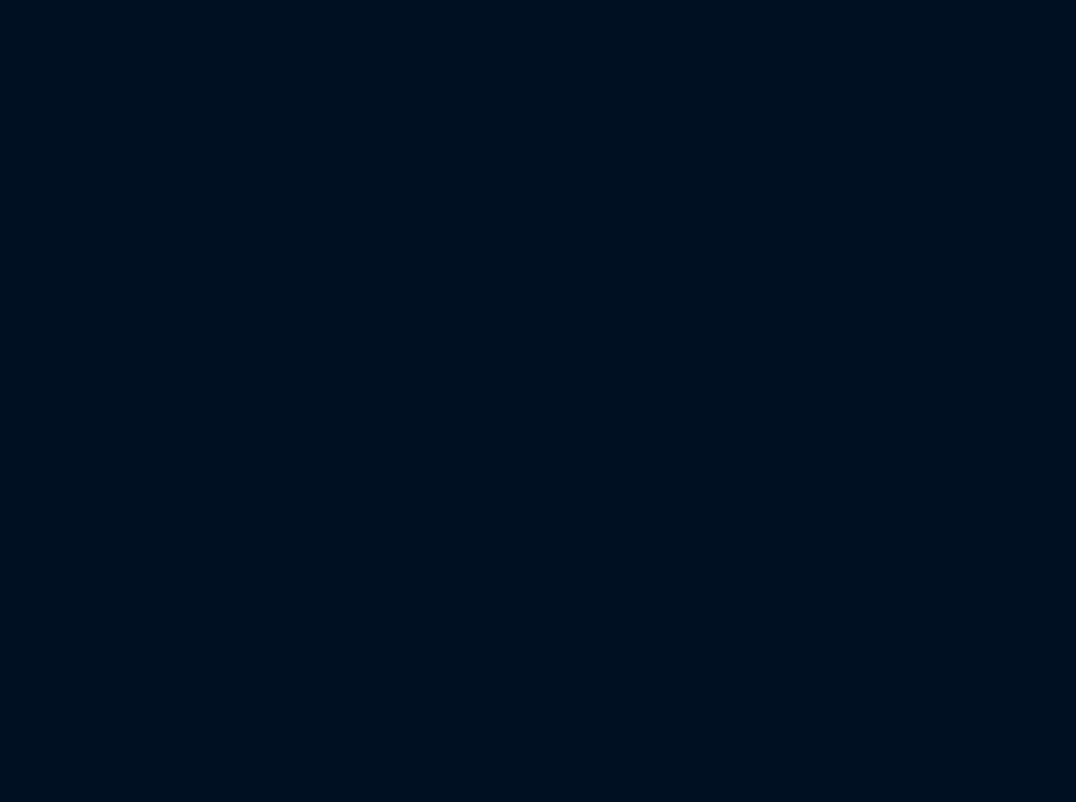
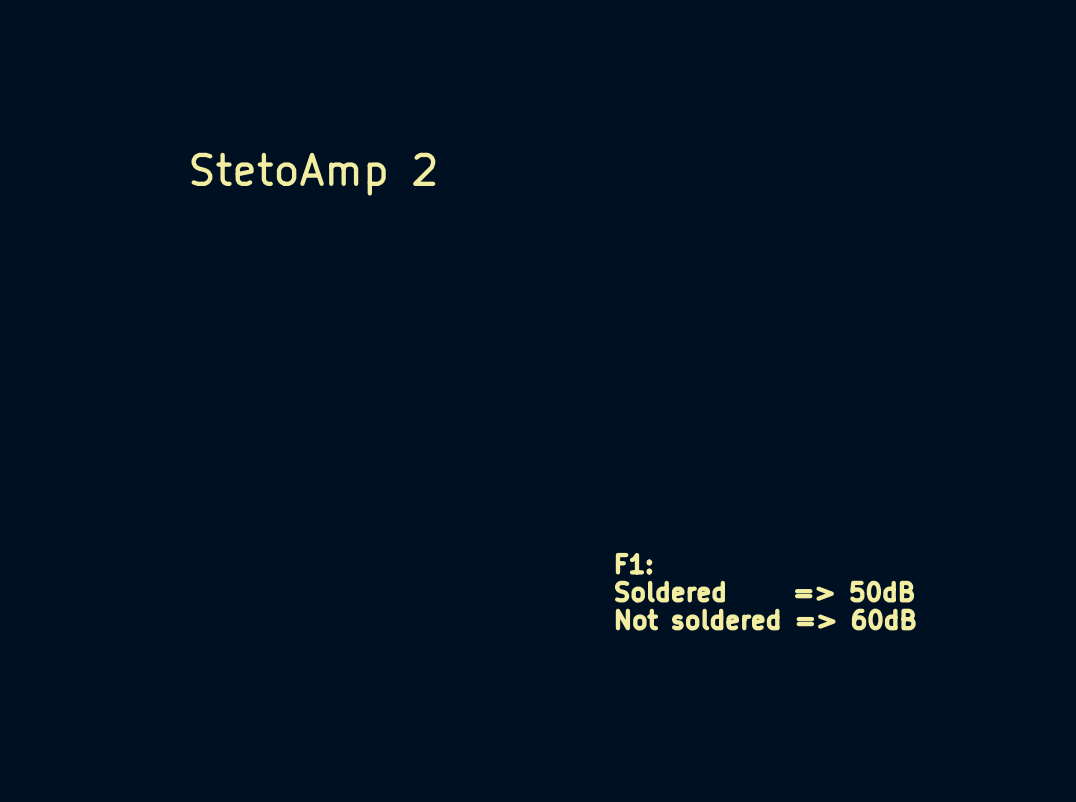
text: none -> StetoAmp 2 (313, 174)
text: none -> F1: (634, 563)
text: none -> Soldered => 50dB (764, 591)
text: none -> Not soldered => 60dB (765, 619)

